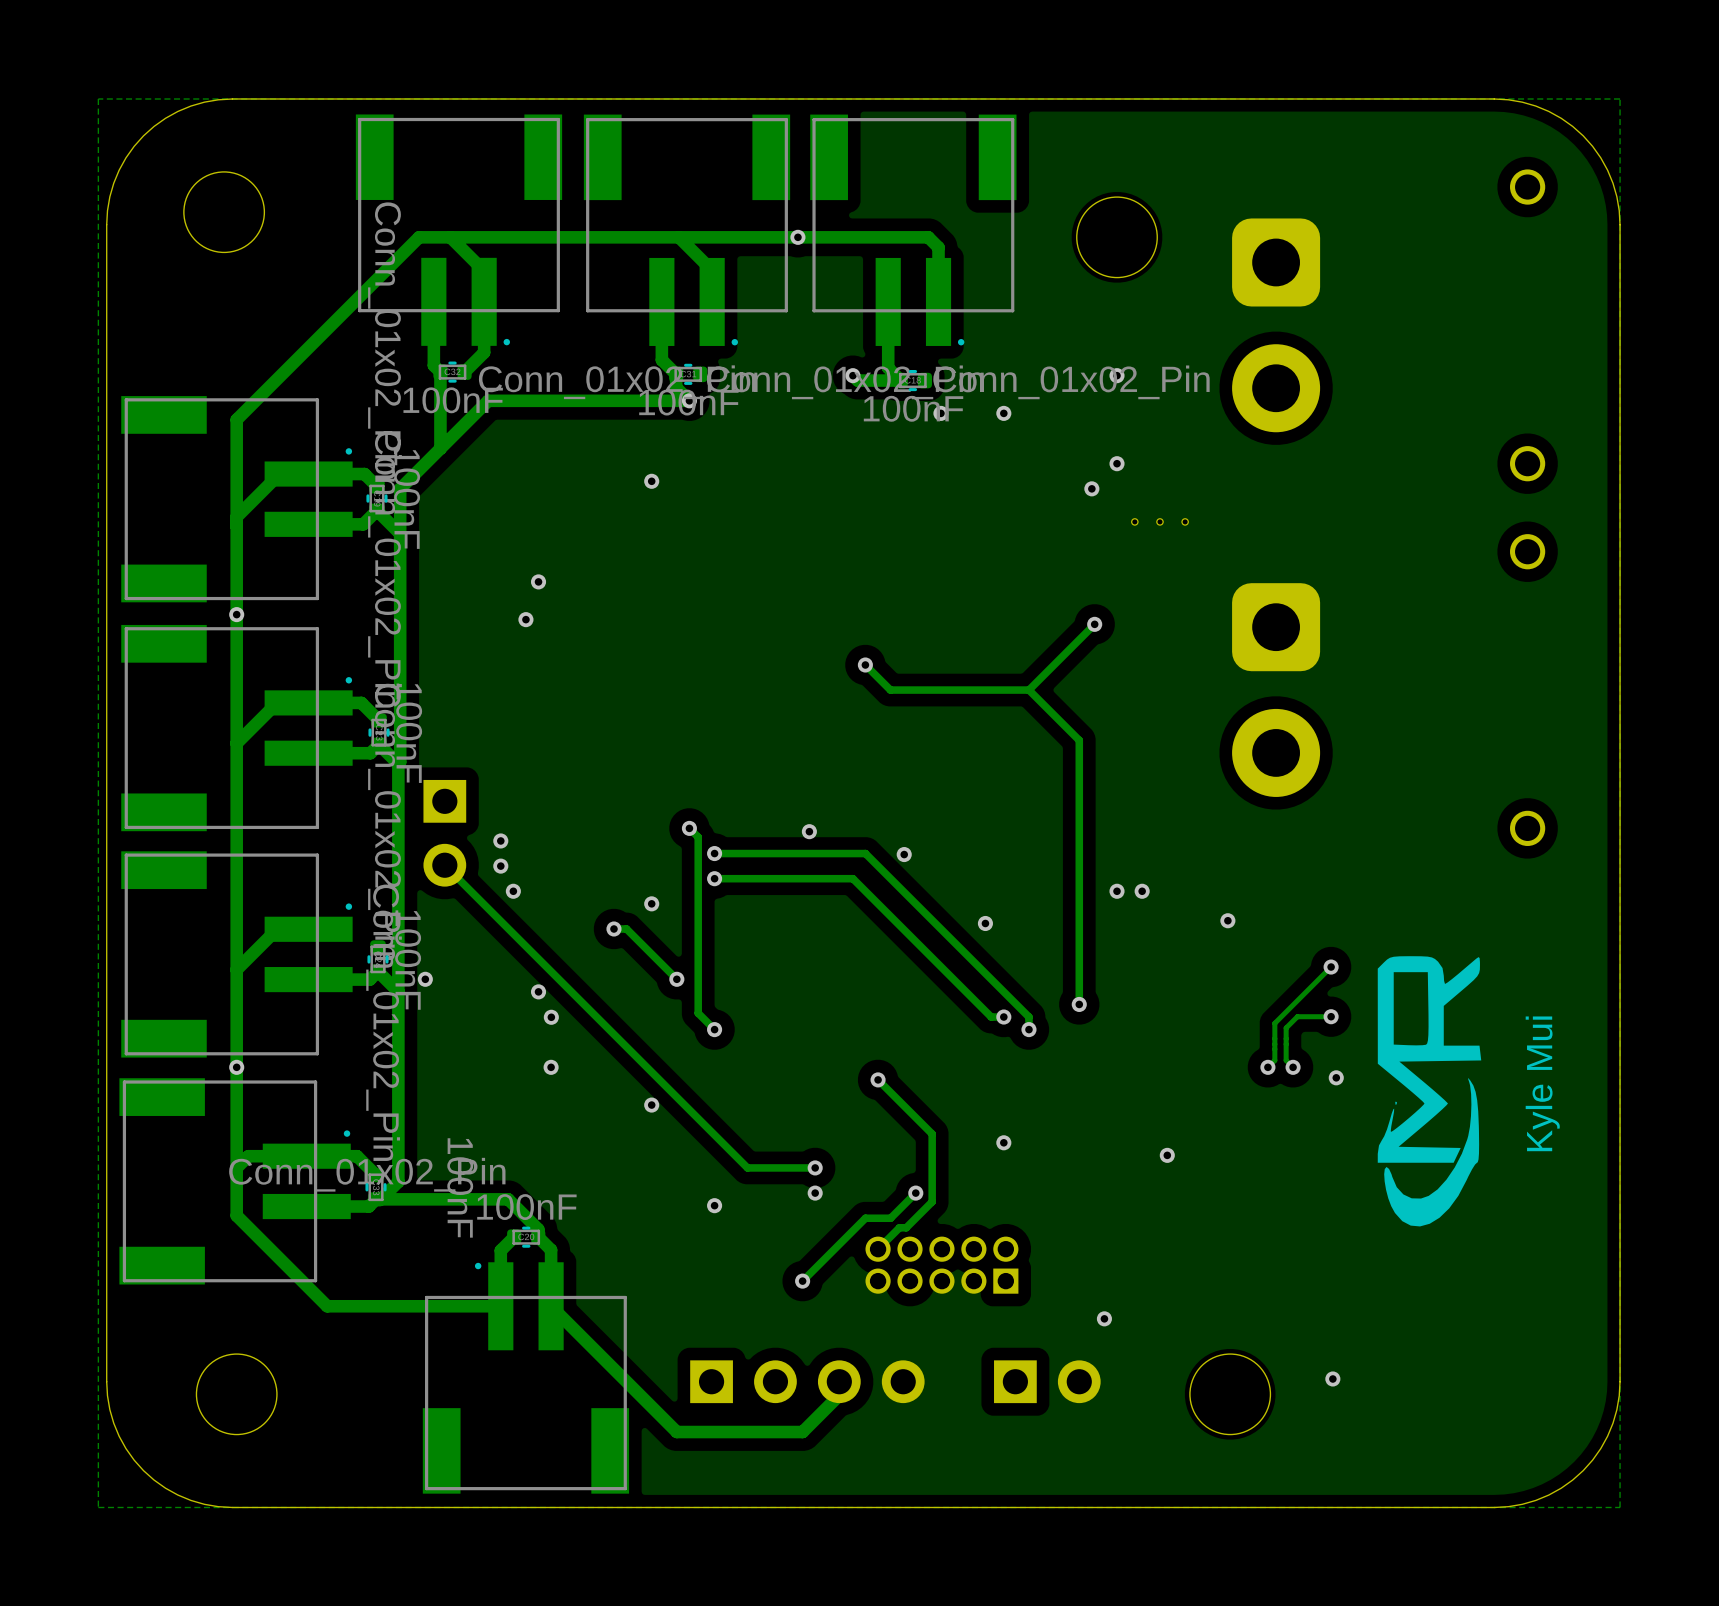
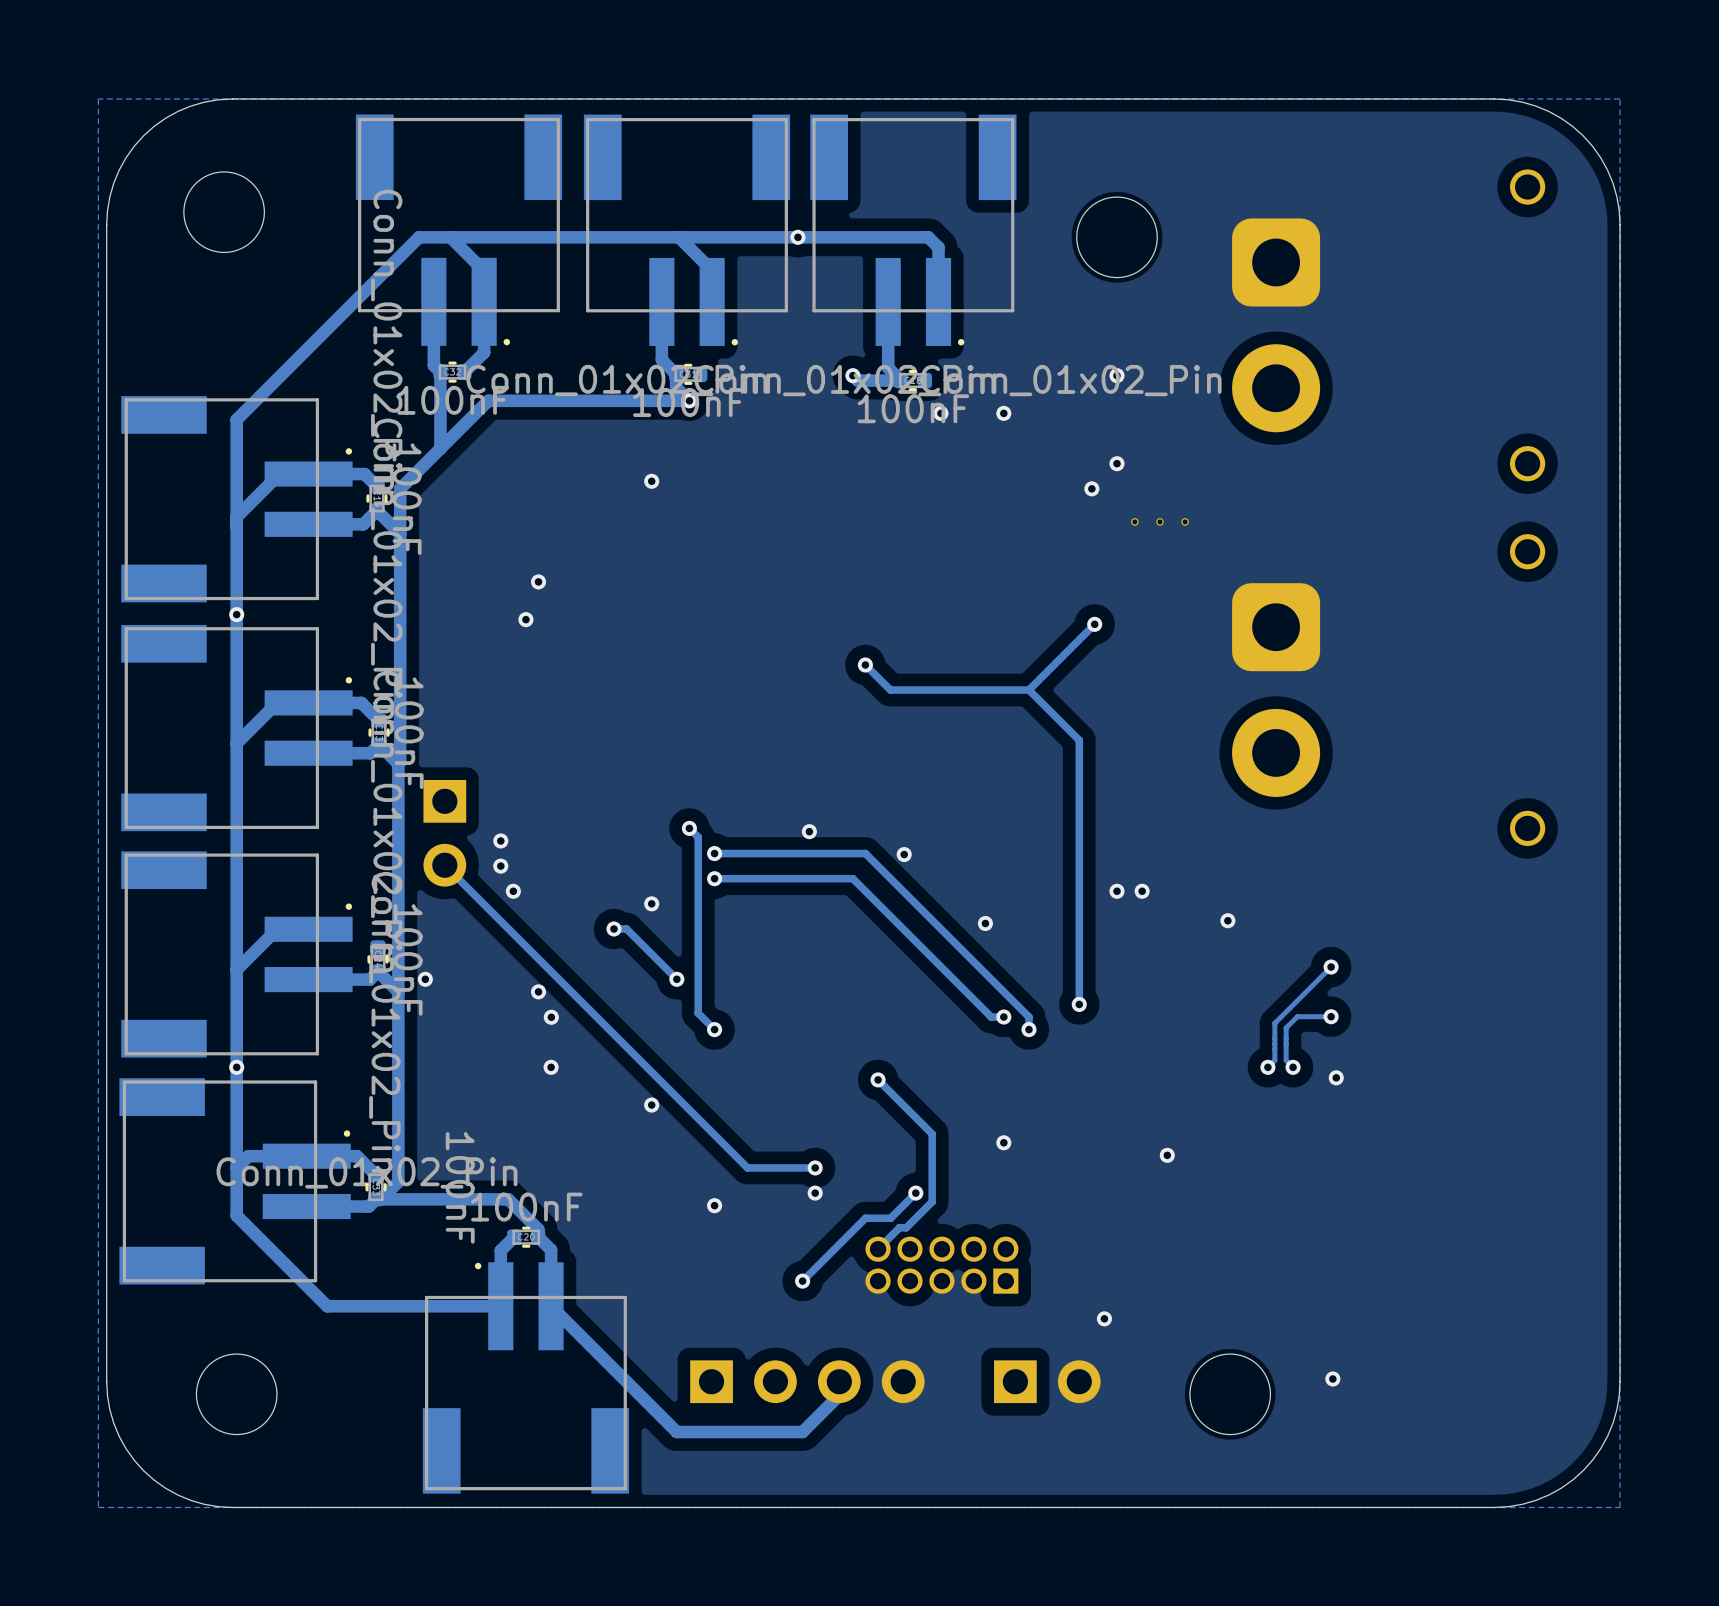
drawing: [1377, 956, 1482, 1227] -> none
text: Kyle Mui (1542, 1083) -> none

